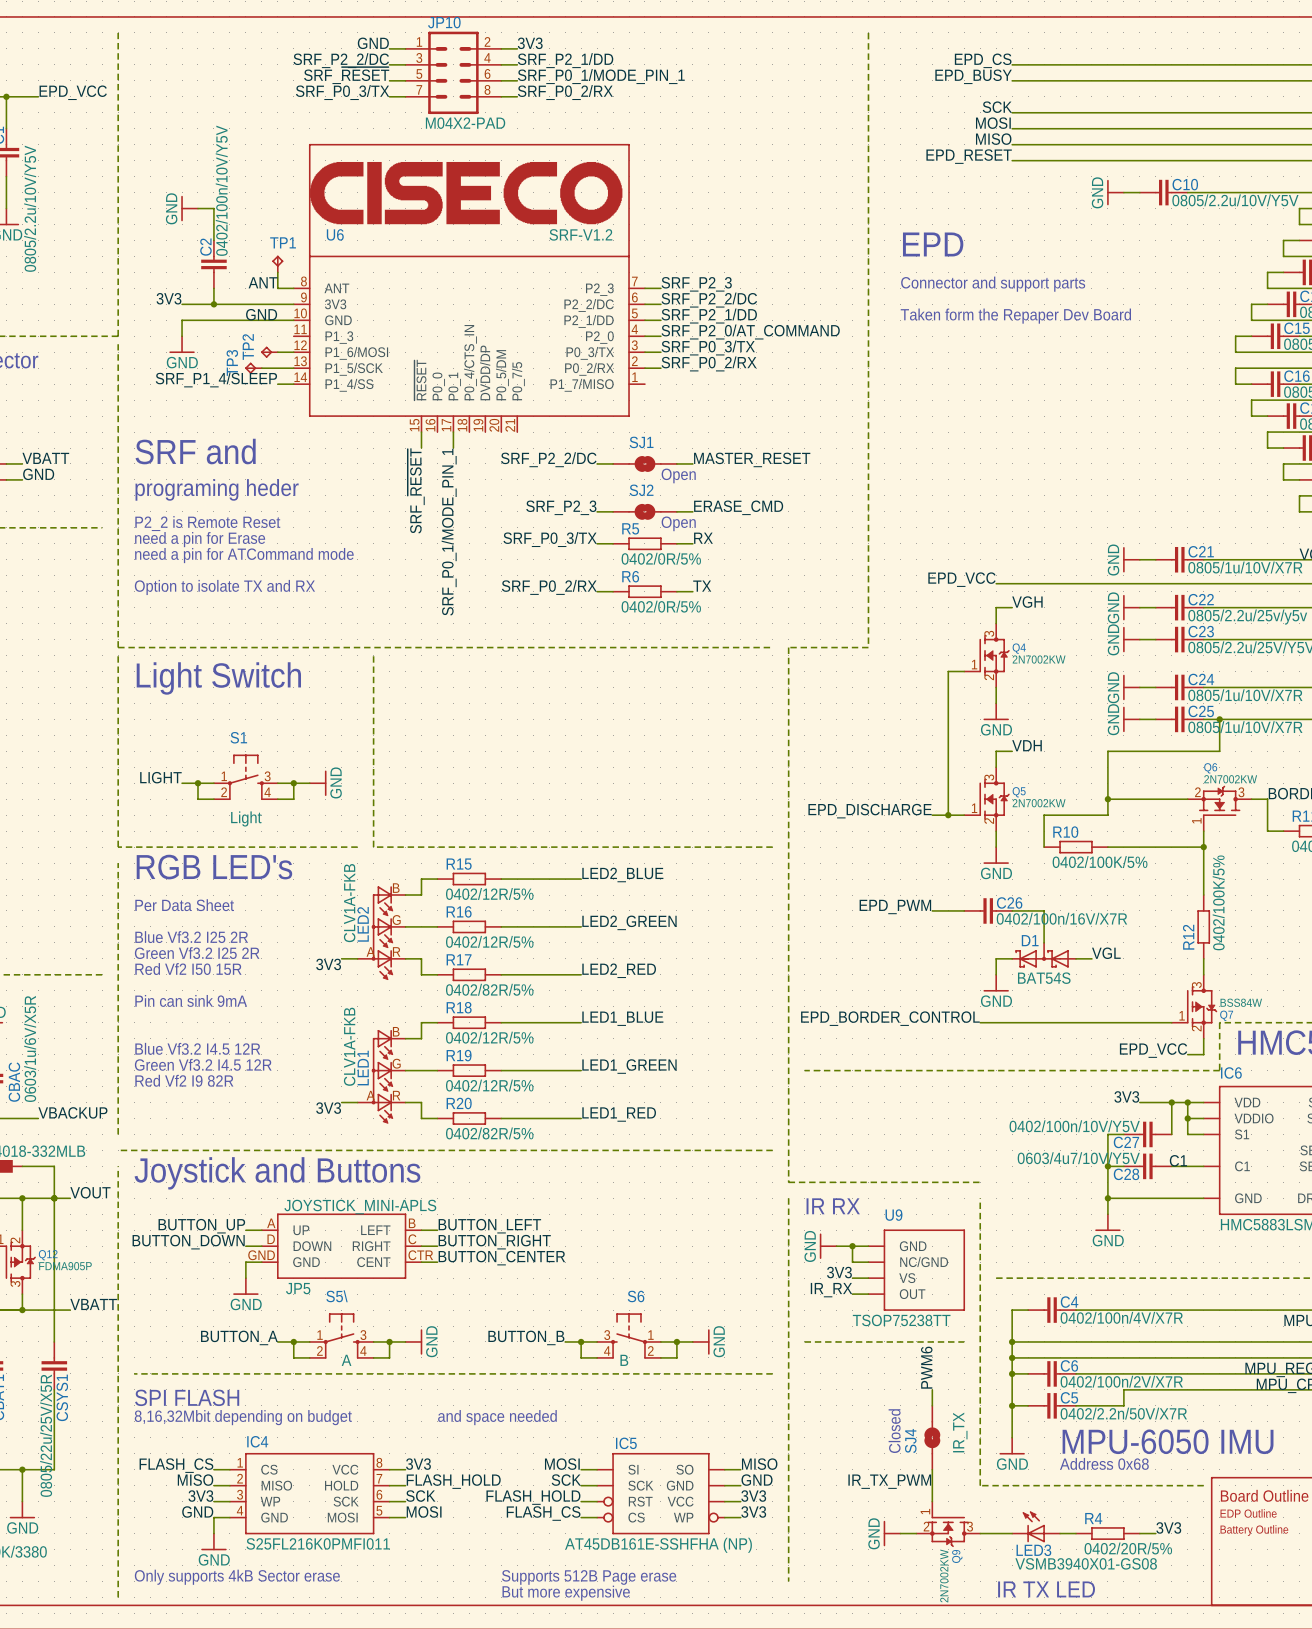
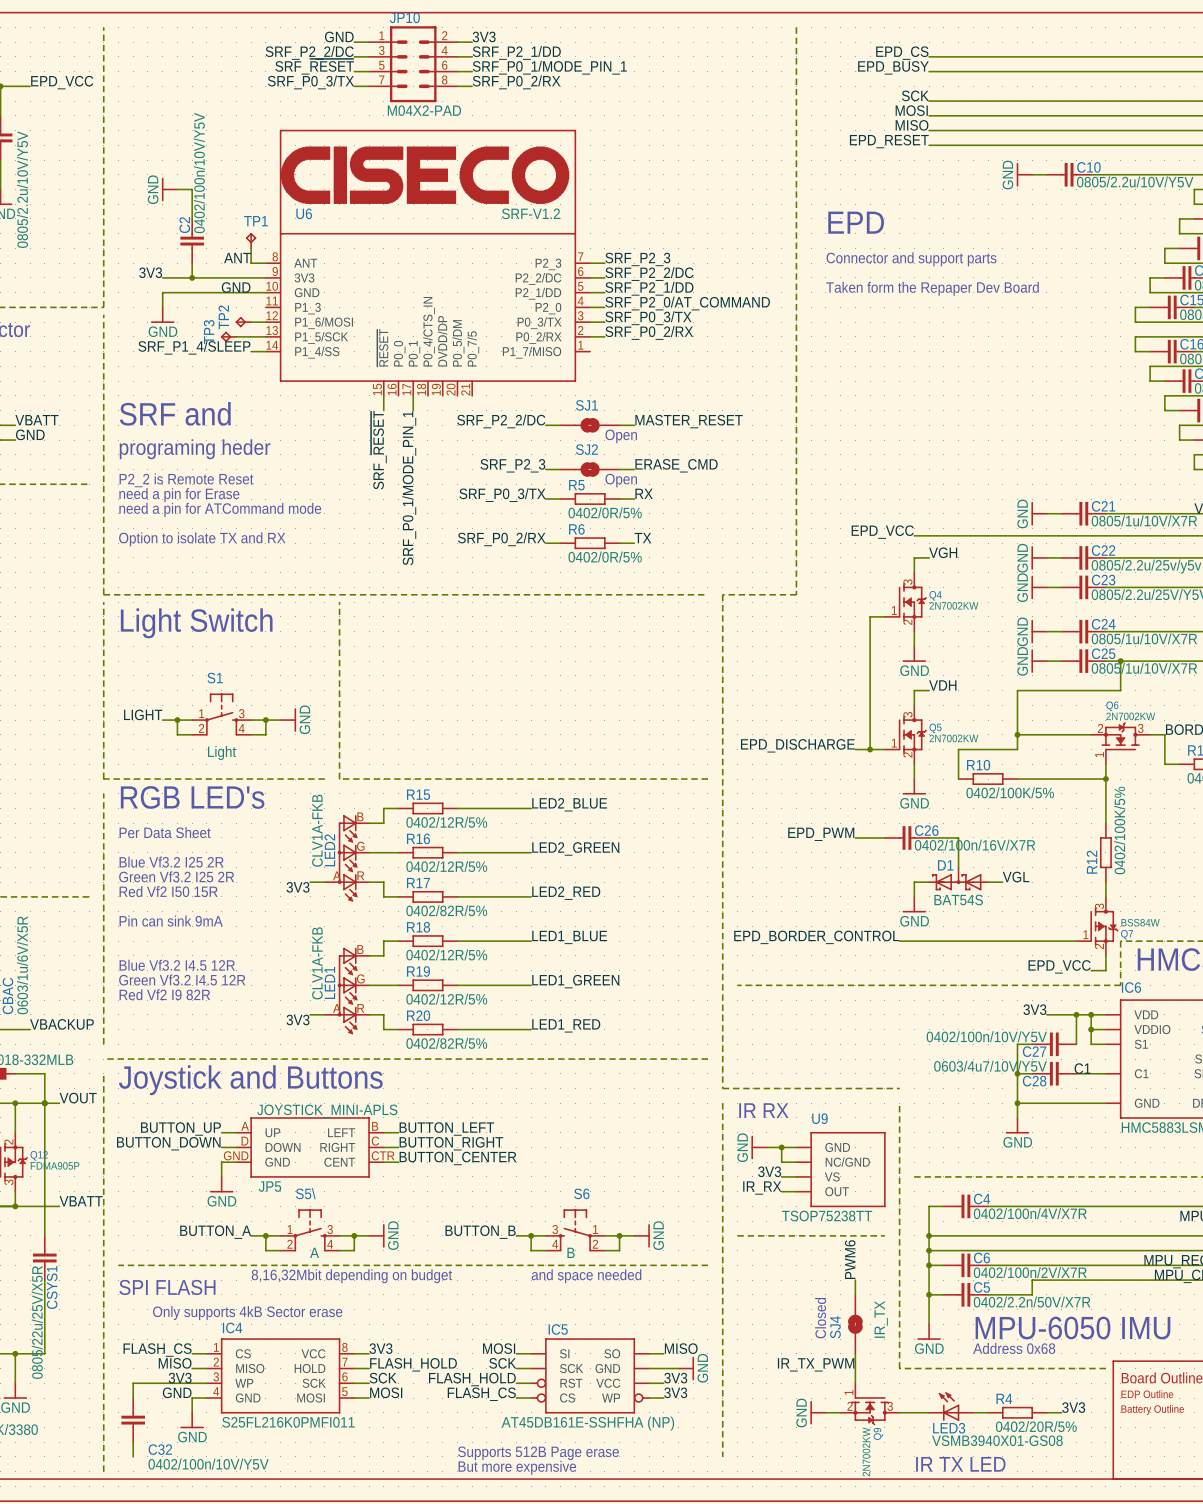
text position: 8,16,32Mbit depending on budget (243, 1417) -> 8,16,32Mbit depending on budget (351, 1276)
text position: and space needed (497, 1417) -> and space needed (586, 1276)
label position: MOSI (562, 1464) -> MOSI (499, 1348)
label position: MISO (759, 1464) -> MISO (681, 1348)
label position: SCK (566, 1480) -> SCK (502, 1363)
label: GND (757, 1480) -> none
power symbol: none -> GND (686, 1368)
IC5 position: (660, 1493) -> (590, 1375)
label: none -> 3V3 (675, 1378)
label: 3V3 (753, 1496) -> none
label position: FLASH_HOLD (533, 1497) -> FLASH_HOLD (472, 1379)
wire: none -> (192, 1383) (133, 1383) (133, 1398)
label: none -> 3V3 (675, 1392)
label: 3V3 (753, 1512) -> none
label position: FLASH_CS (543, 1513) -> FLASH_CS (481, 1394)
C32: none -> 0402/100n/10V/Y5V (133, 1420)
wire: none -> (133, 1442) (133, 1456)
text position: Only supports 4kB Sector erase (237, 1577) -> Only supports 4kB Sector erase (247, 1313)

